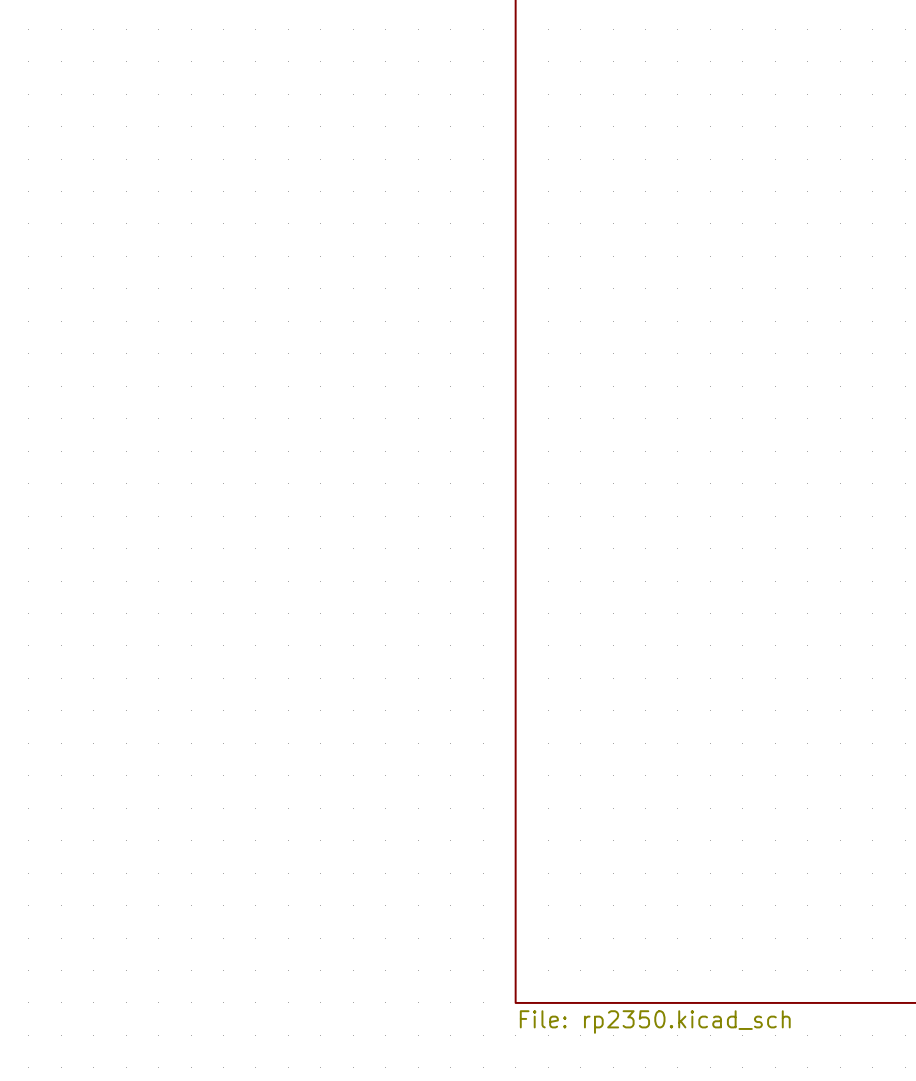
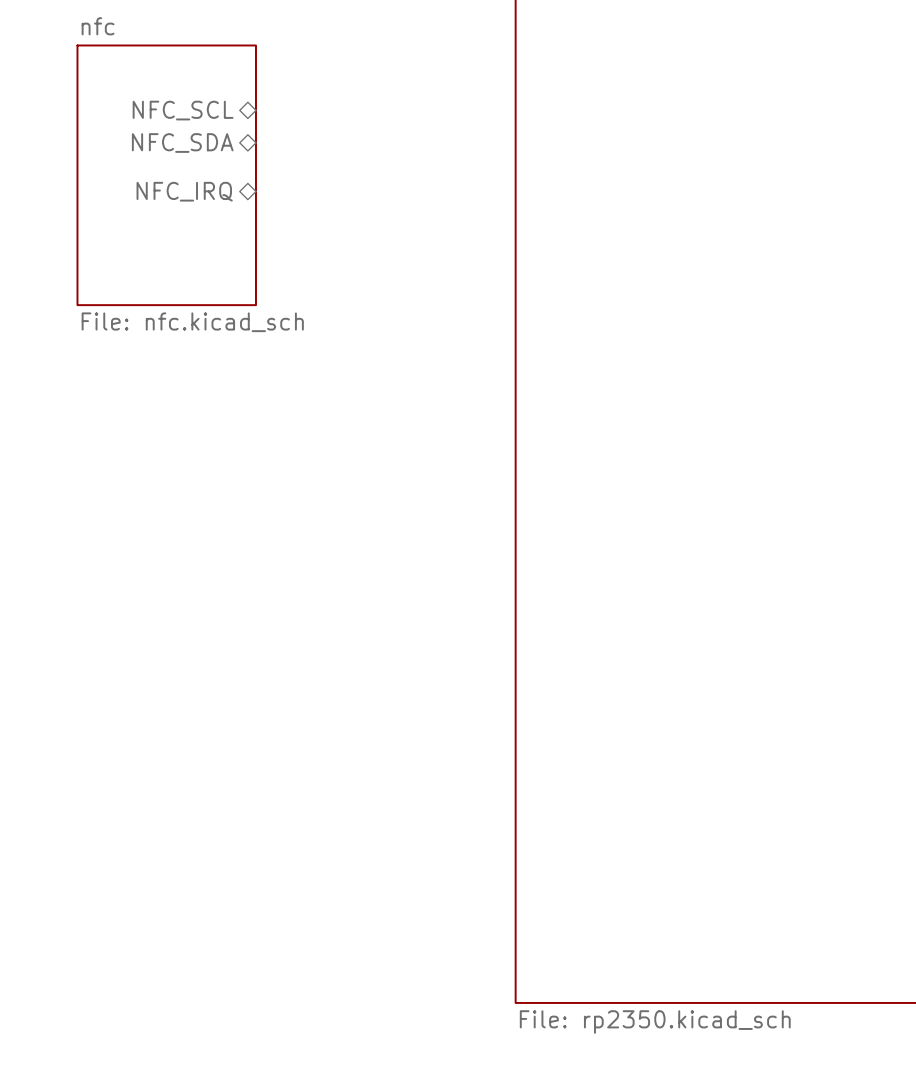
sheet pin: none -> NFC_SCL (183, 110)
sheet pin: none -> NFC_SDA (182, 143)
sheet nfc: none -> File: nfc.kicad_sch (166, 175)
sheet pin: none -> NFC_IRQ (184, 191)

